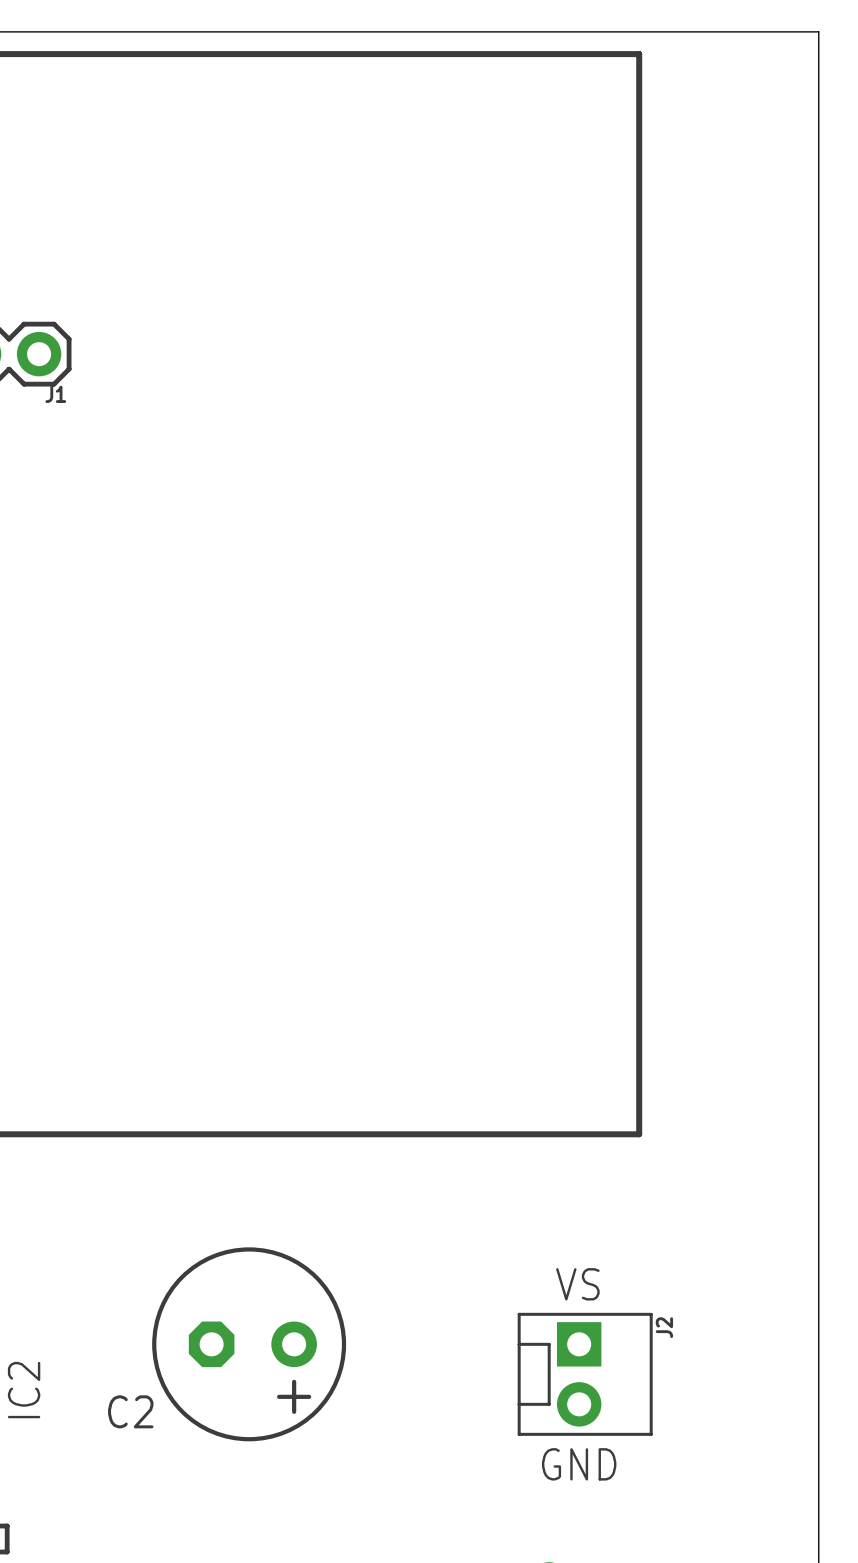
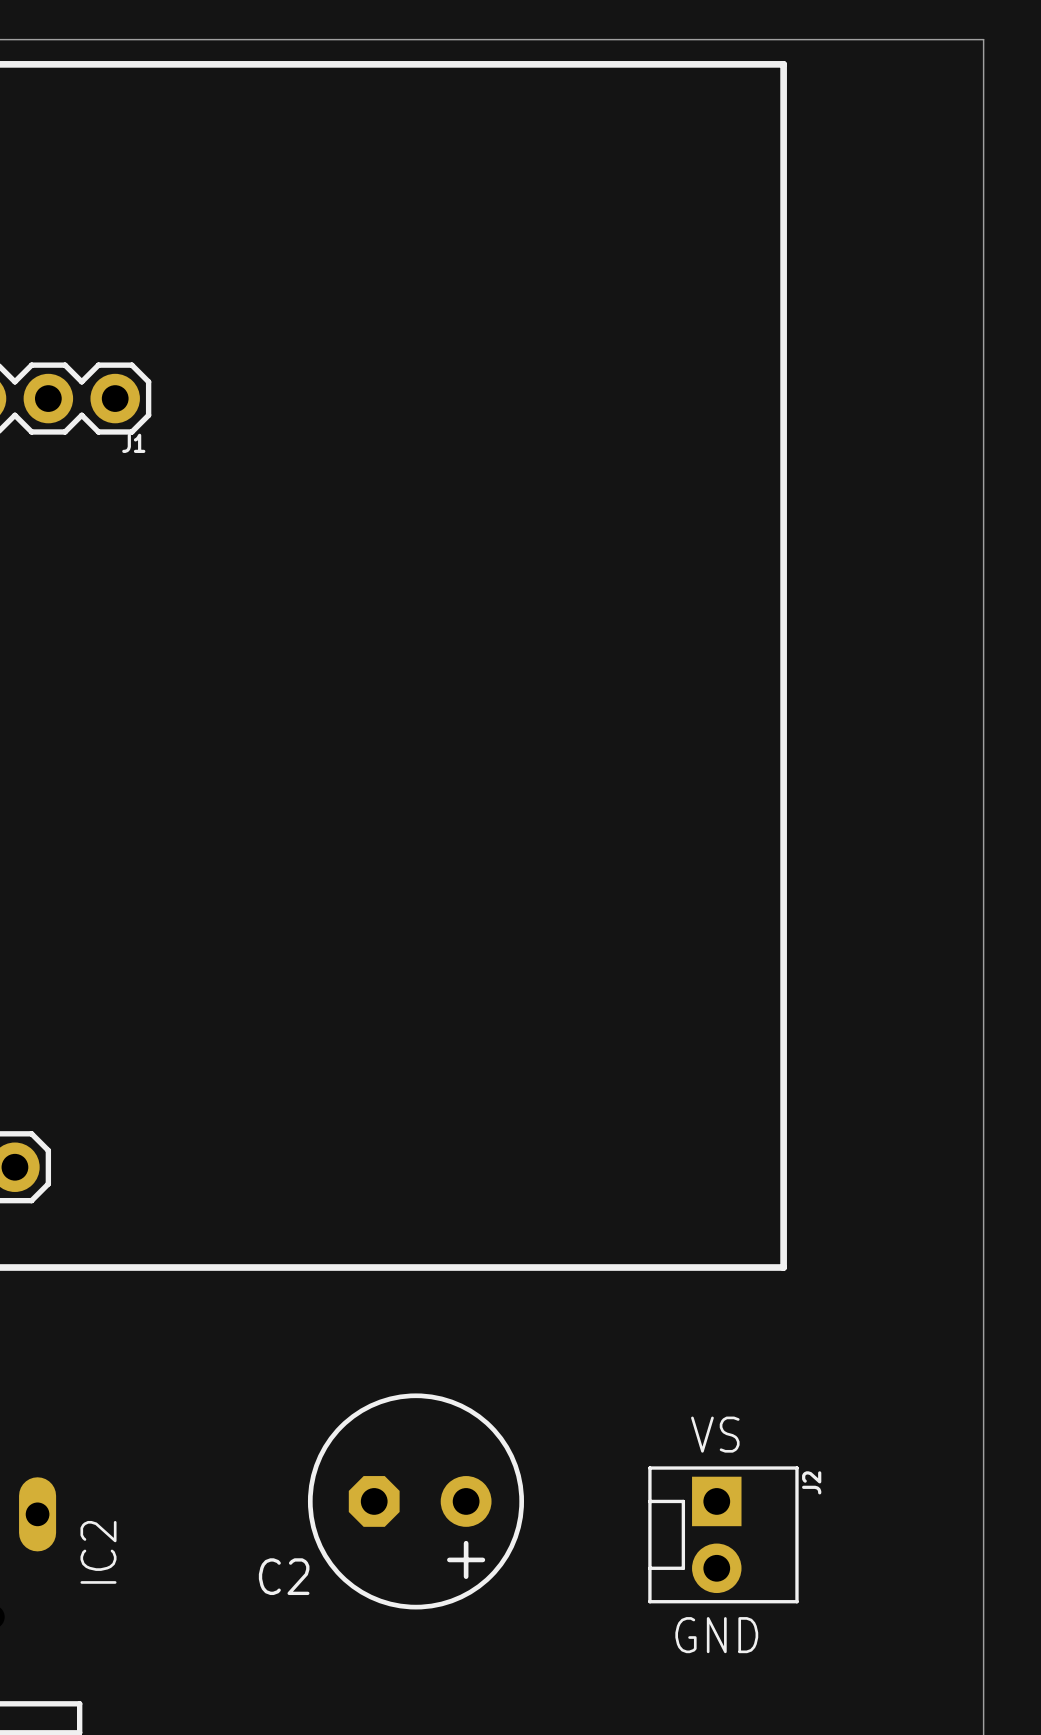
C2 position: (249, 1344) -> (415, 1501)

